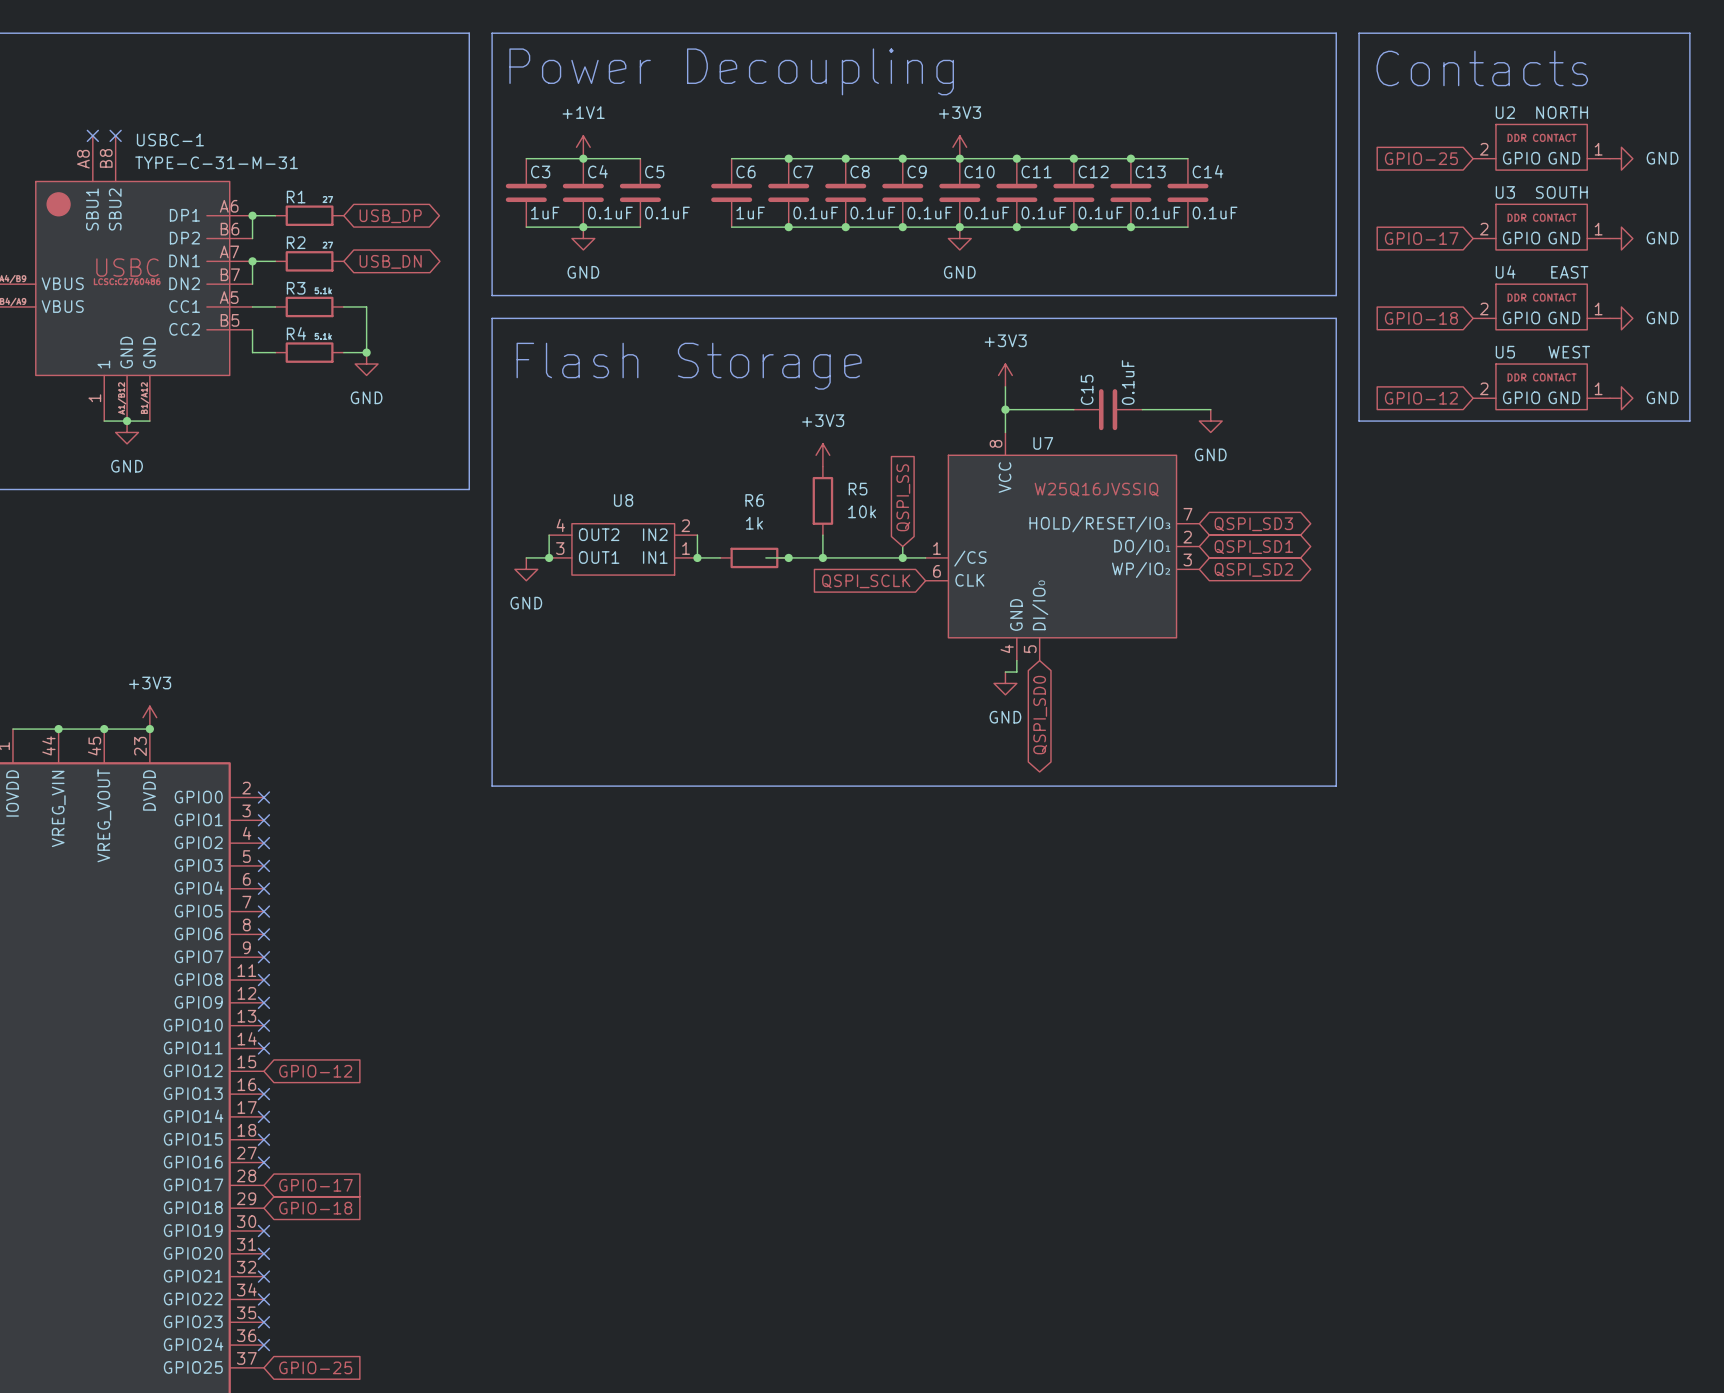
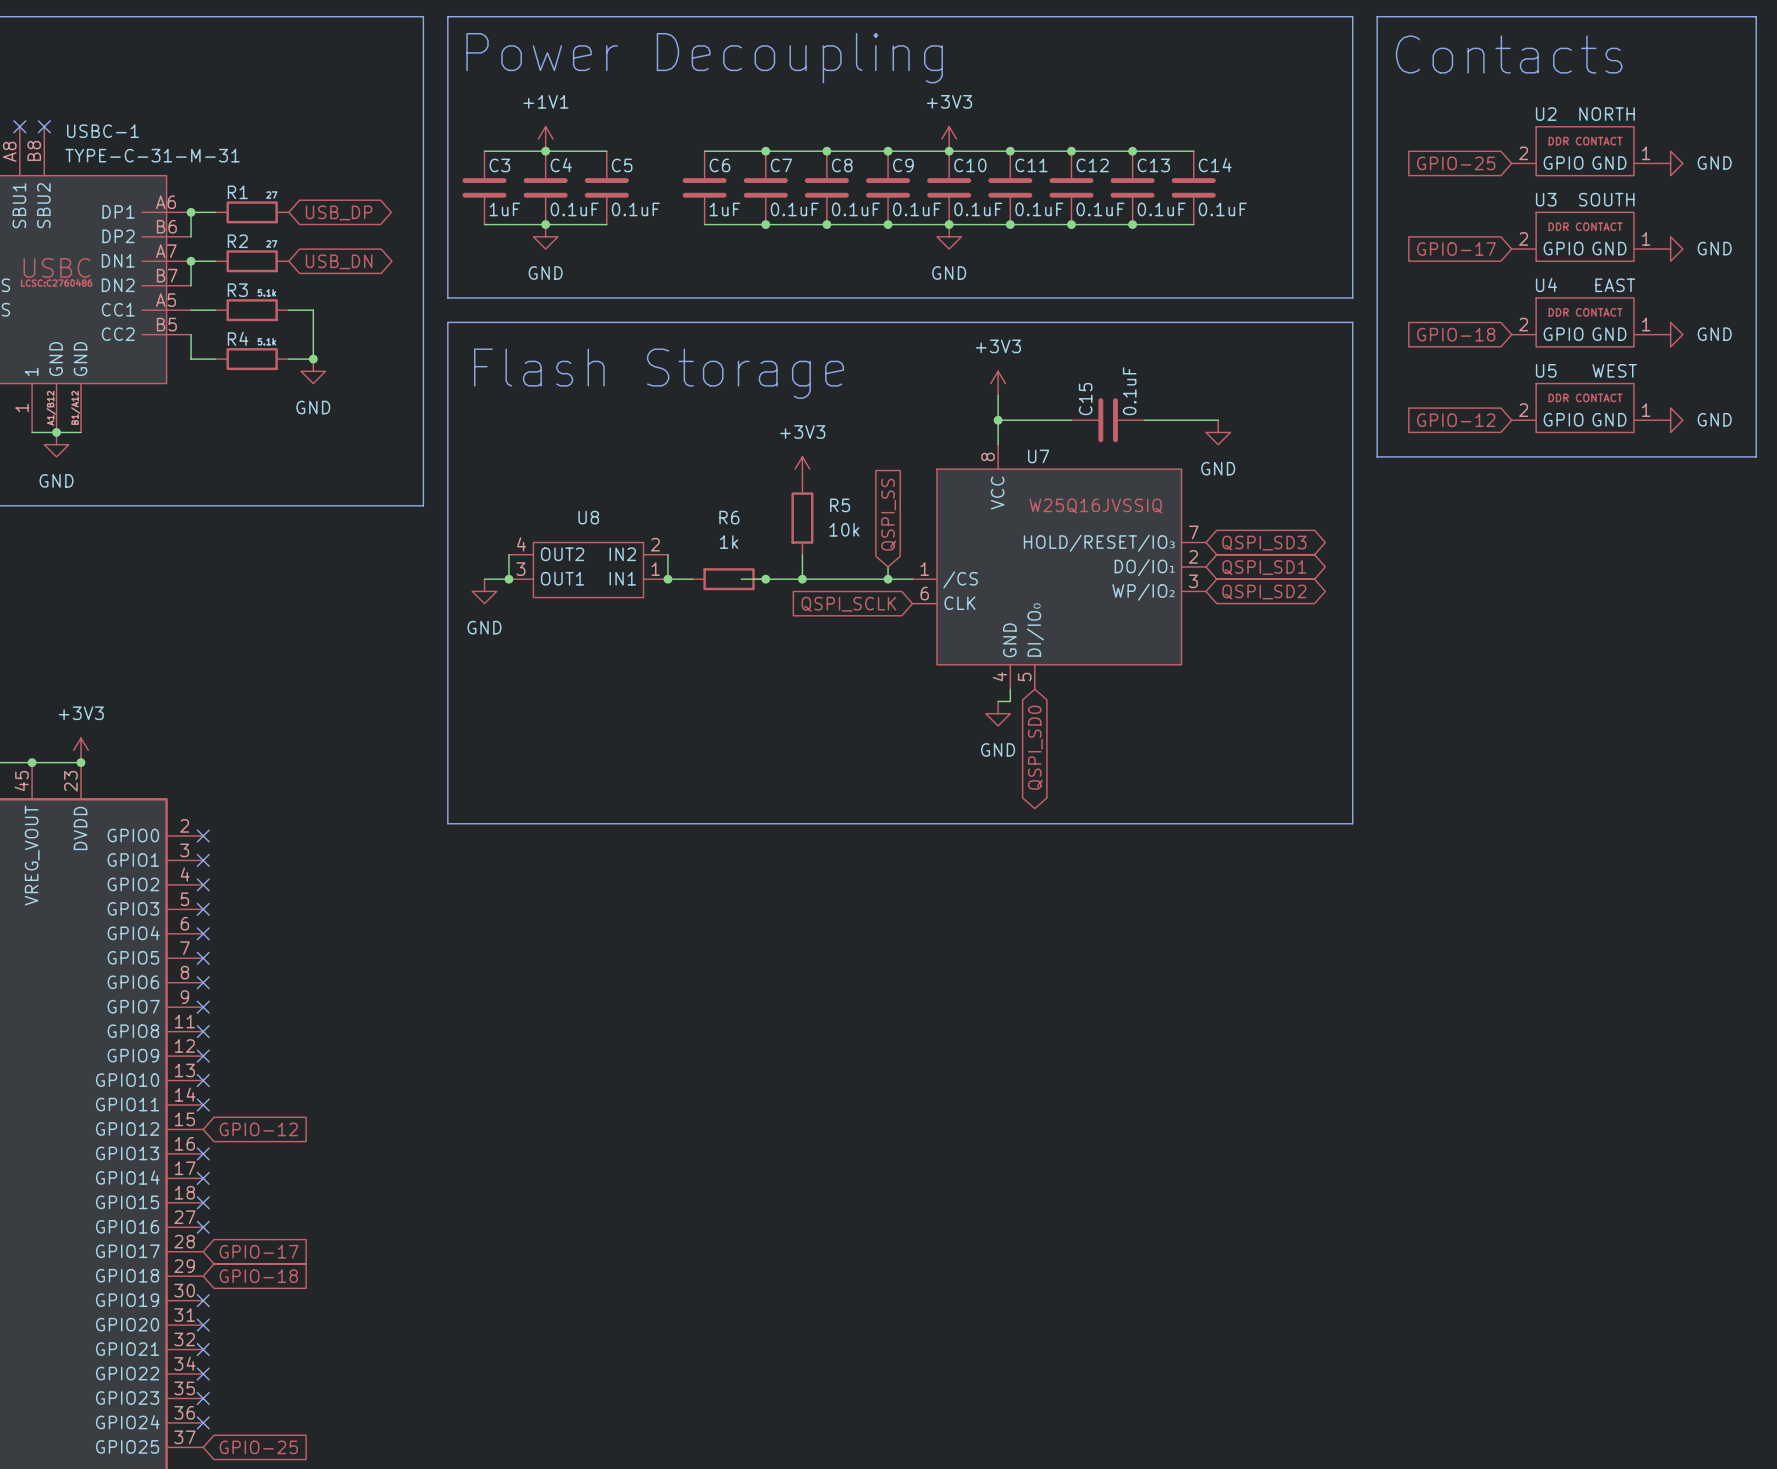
line: (1689, 33) (1689, 421) (1359, 421) -> (1731, 16) (1756, 16) (1756, 456) (1377, 456) (1377, 432)
U2 position: (1541, 147) -> (1585, 151)
global label position: GPIO-25 (1421, 158) -> GPIO-25 (1456, 163)
power symbol position: GND (1621, 158) -> GND (1670, 163)
U3 position: (1541, 227) -> (1585, 236)
global label position: GPIO-17 (1421, 238) -> GPIO-17 (1456, 249)
power symbol position: GND (1621, 238) -> GND (1670, 249)
U4 position: (1541, 306) -> (1585, 322)
global label position: GPIO-18 (1421, 318) -> GPIO-18 (1456, 334)
power symbol position: GND (1621, 318) -> GND (1670, 334)
U5 position: (1541, 386) -> (1585, 408)
global label position: GPIO-12 (1421, 398) -> GPIO-12 (1456, 420)
power symbol position: GND (1621, 398) -> GND (1670, 420)

